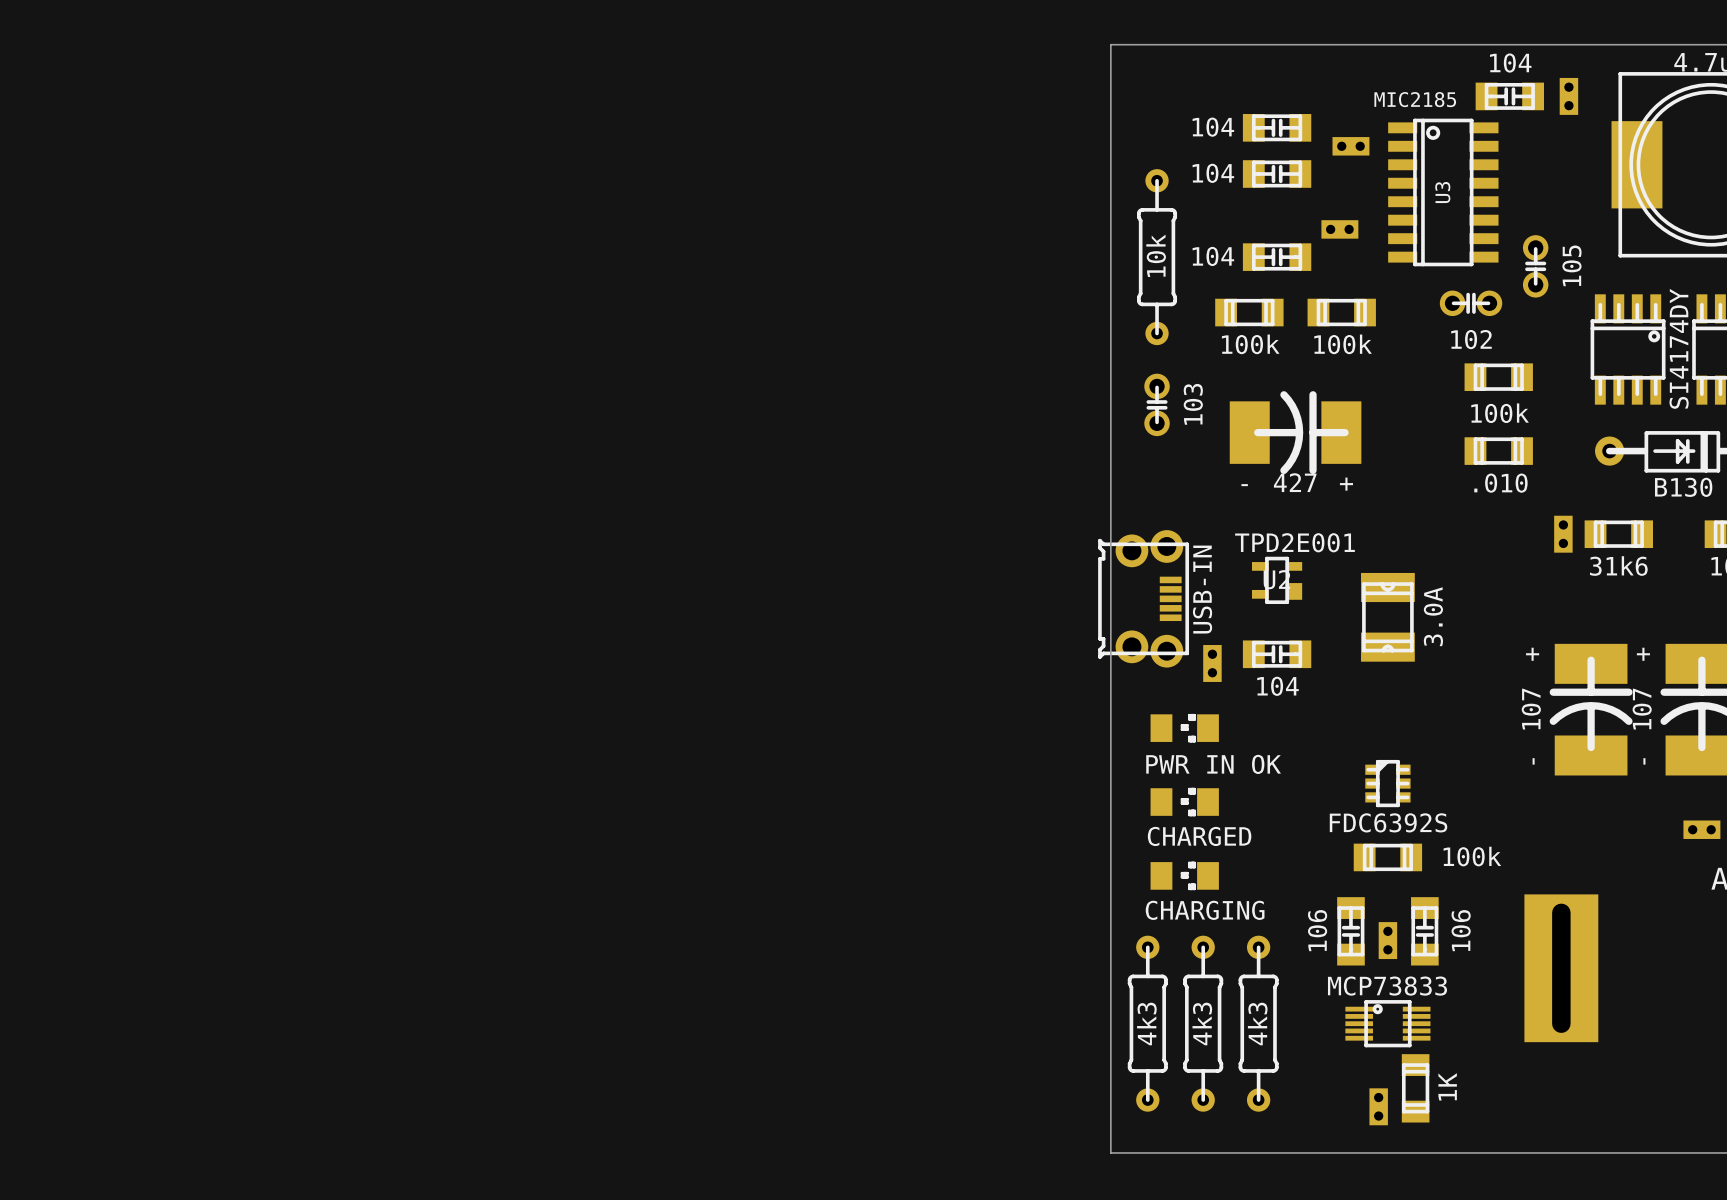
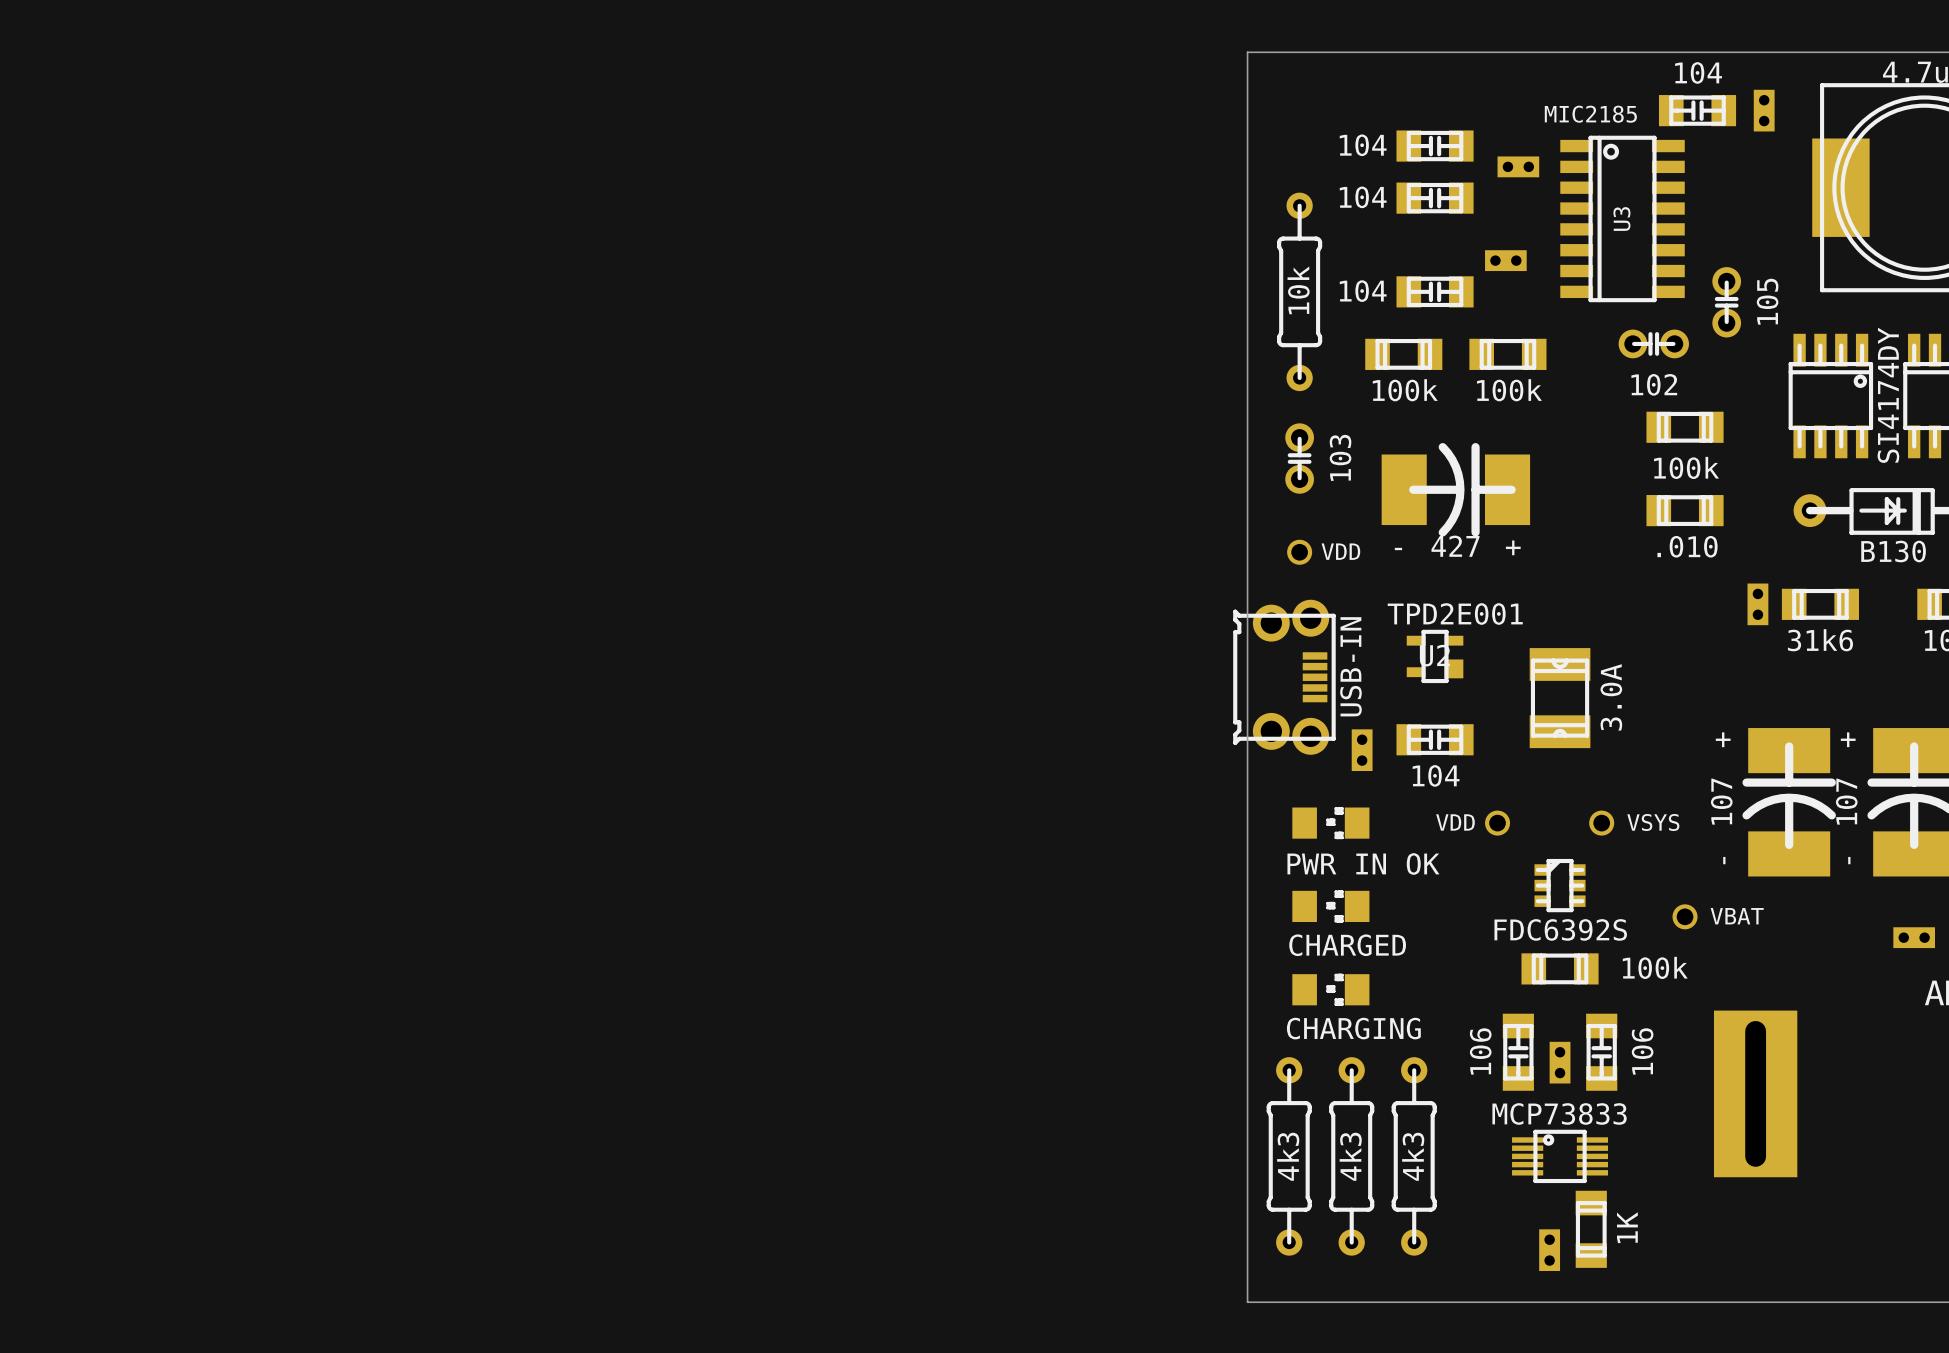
part: none -> VDD (1299, 552)
part: none -> VDD (1497, 823)
part: none -> VSYS (1601, 823)
part: none -> VBAT (1685, 916)

